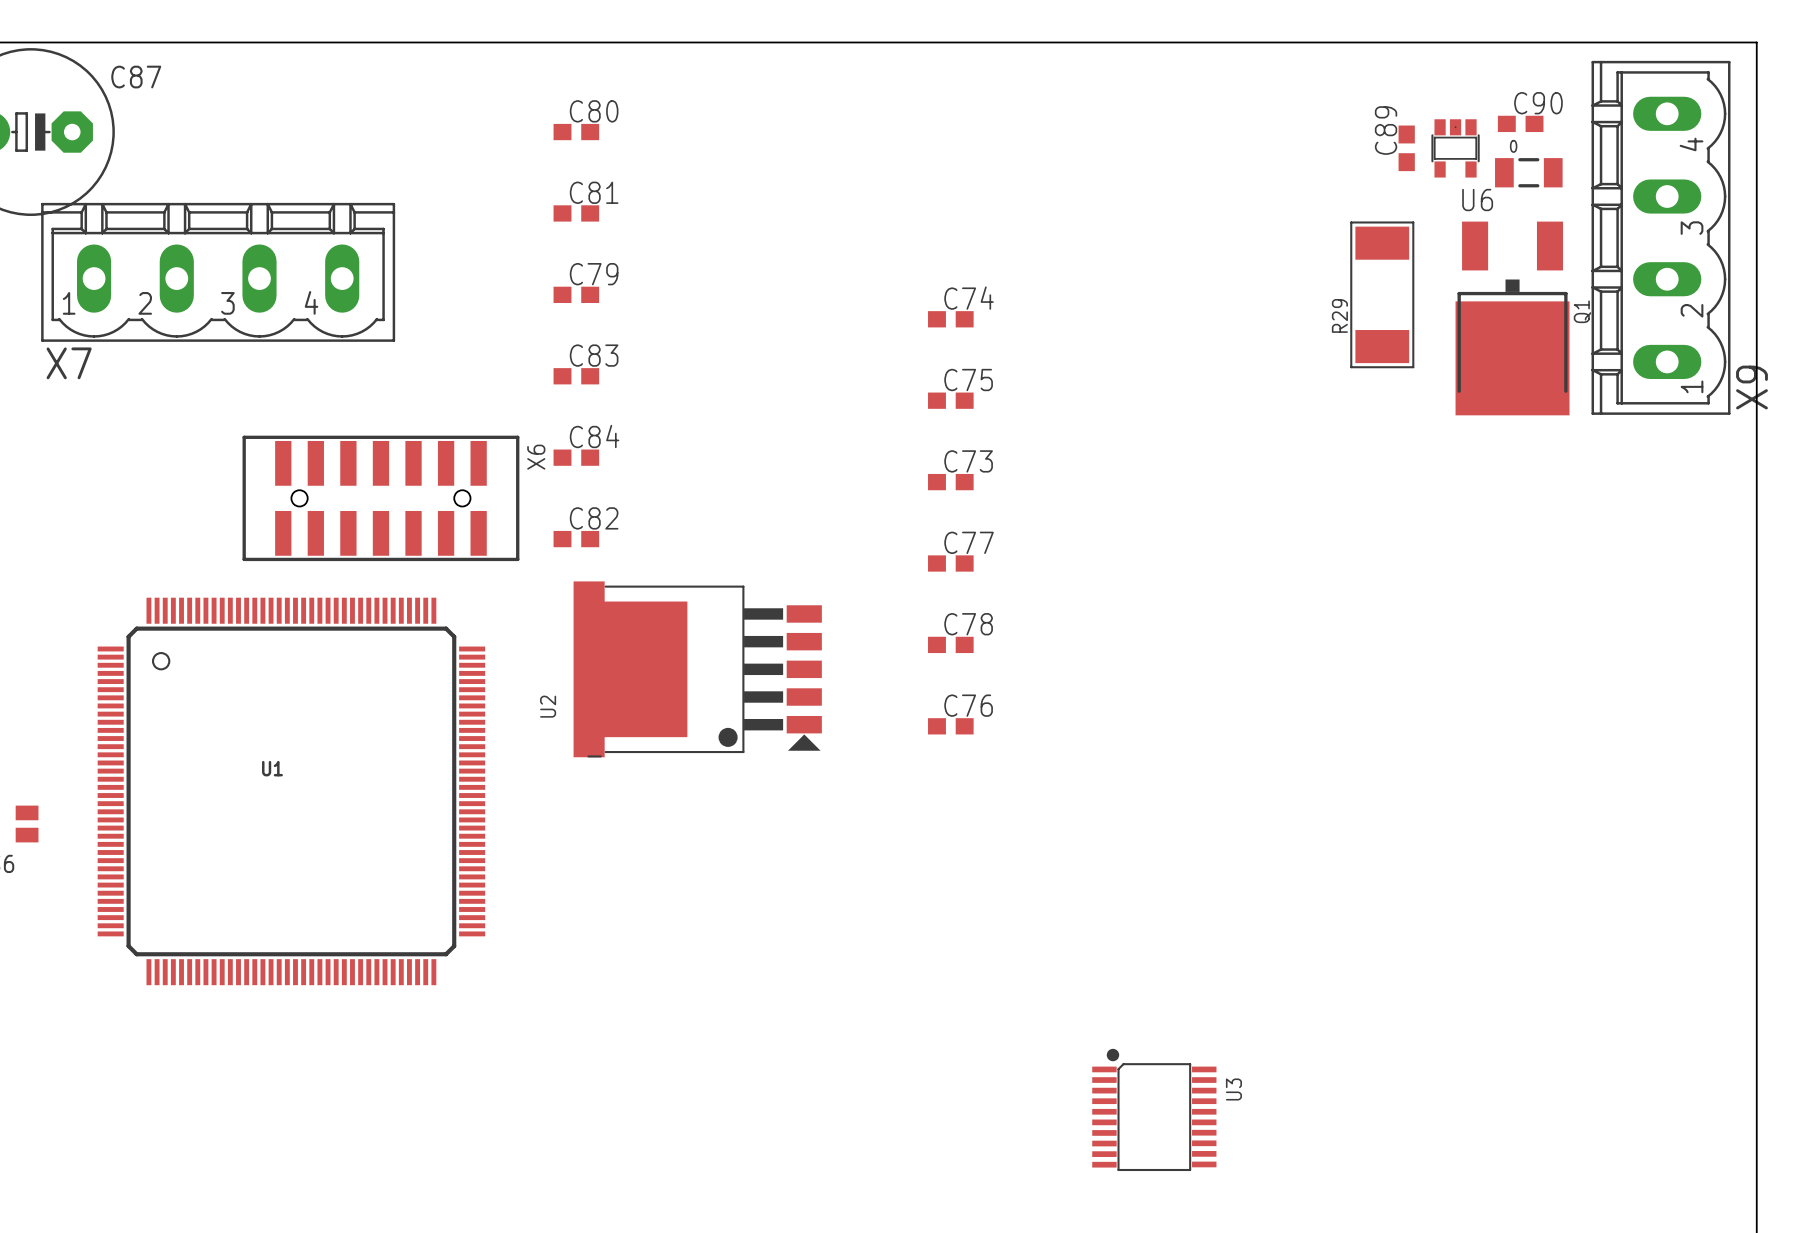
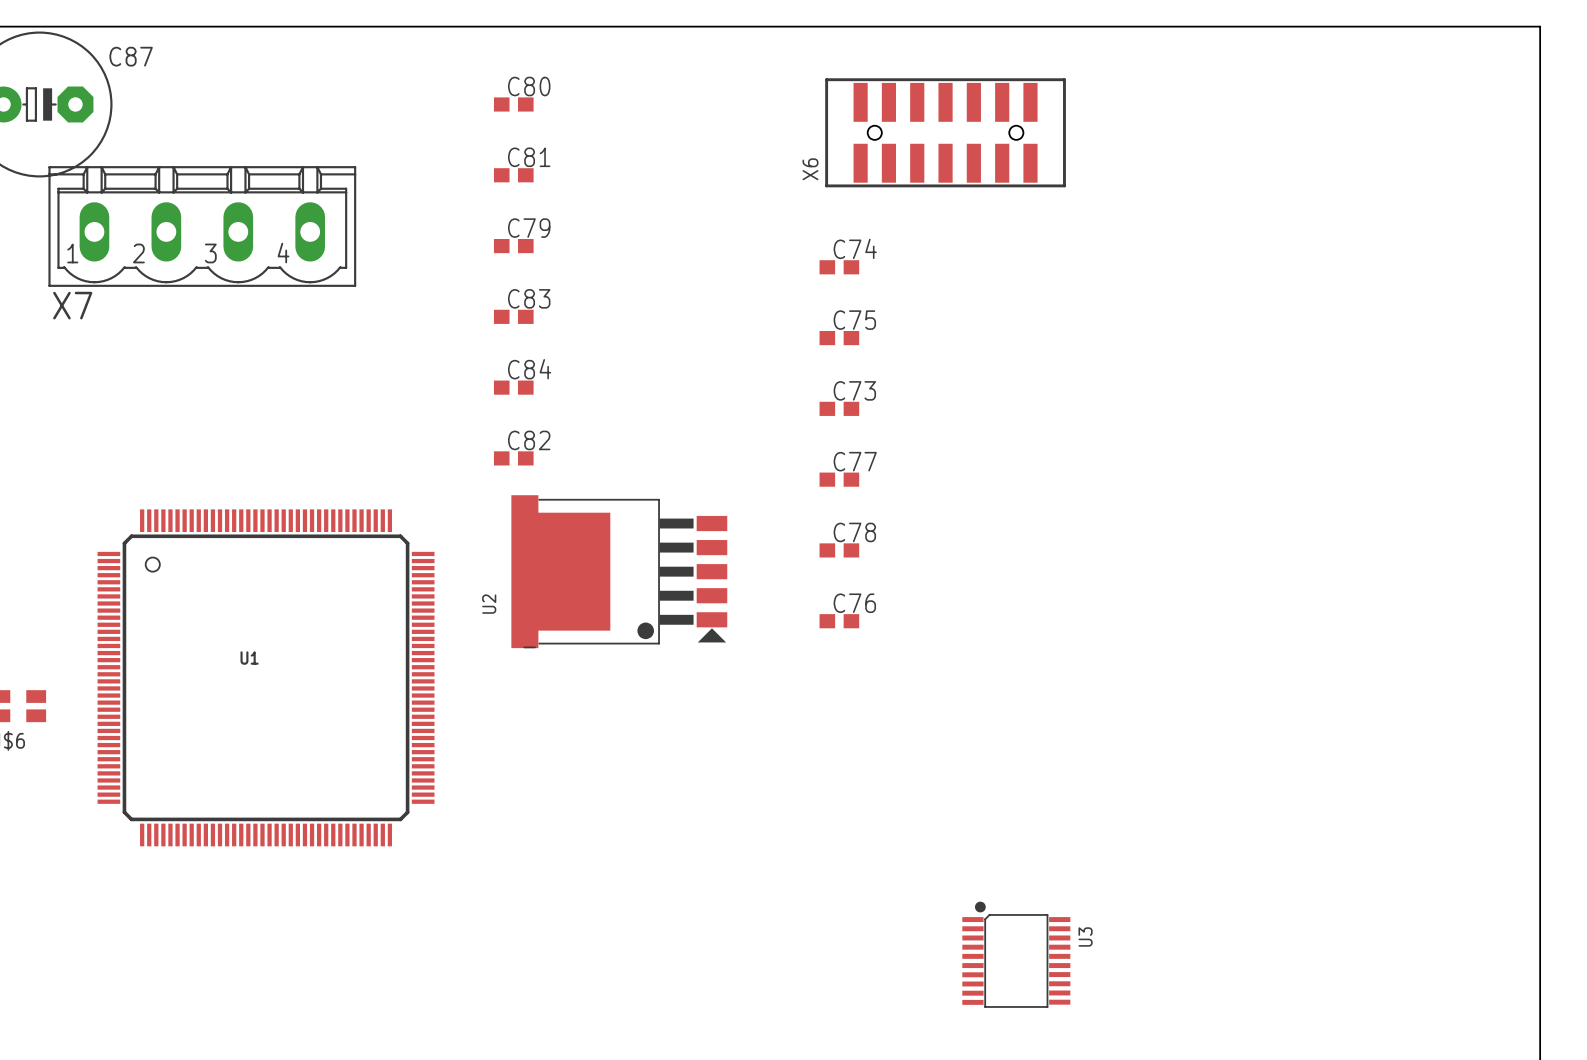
C90: (1520, 123) -> none
C89: (1406, 148) -> none
U6: (1455, 148) -> none
part: 0 (1528, 172) -> none
X9: (1661, 237) -> none
R29: (1382, 294) -> none
Q1: (1512, 318) -> none
X6 name position: X6 (536, 457) -> X6 (810, 169)
X6 position: (380, 498) -> (945, 132)

